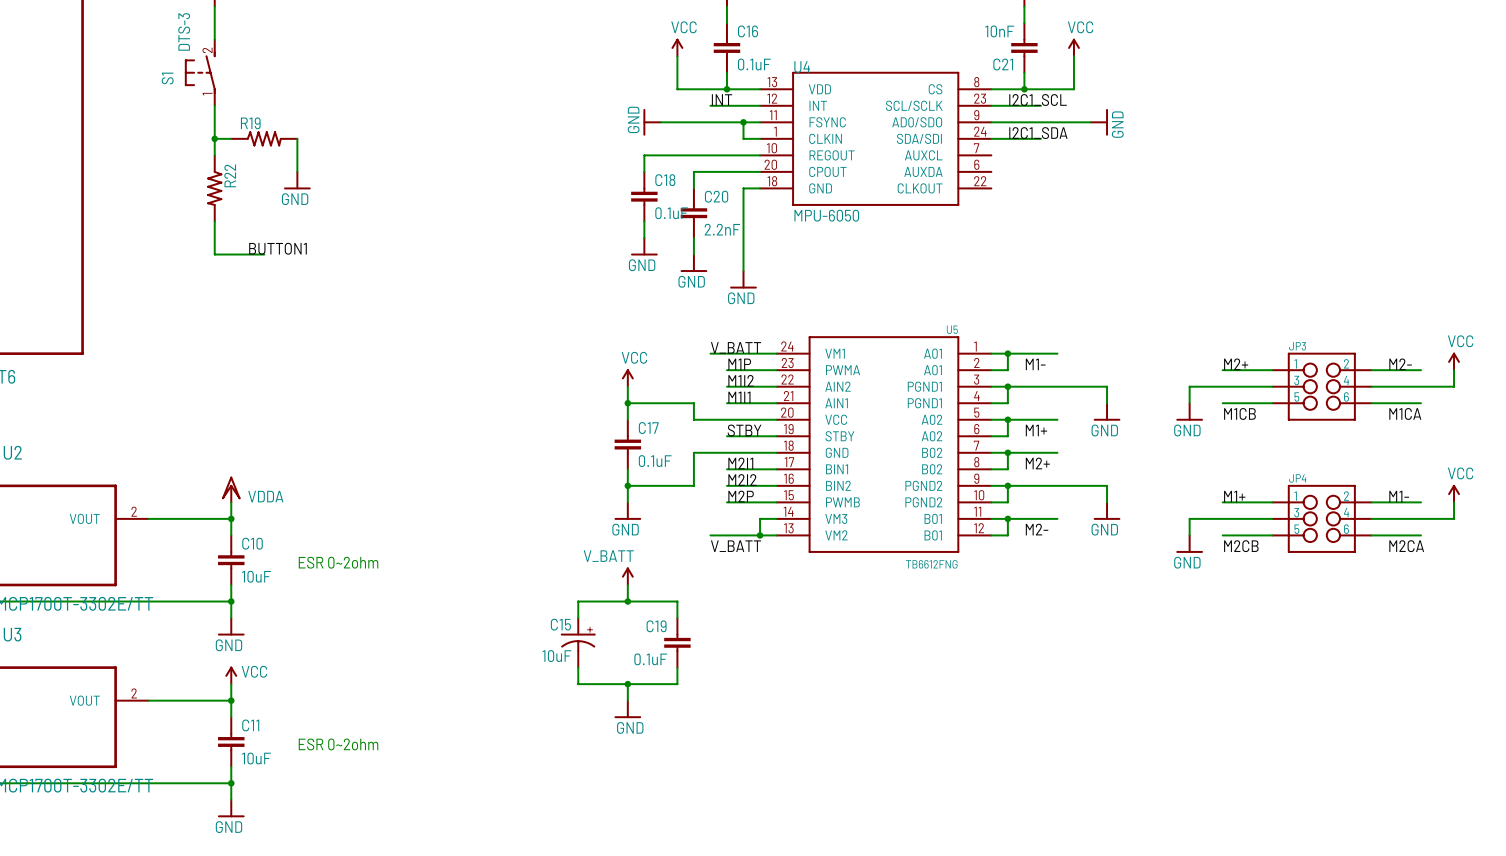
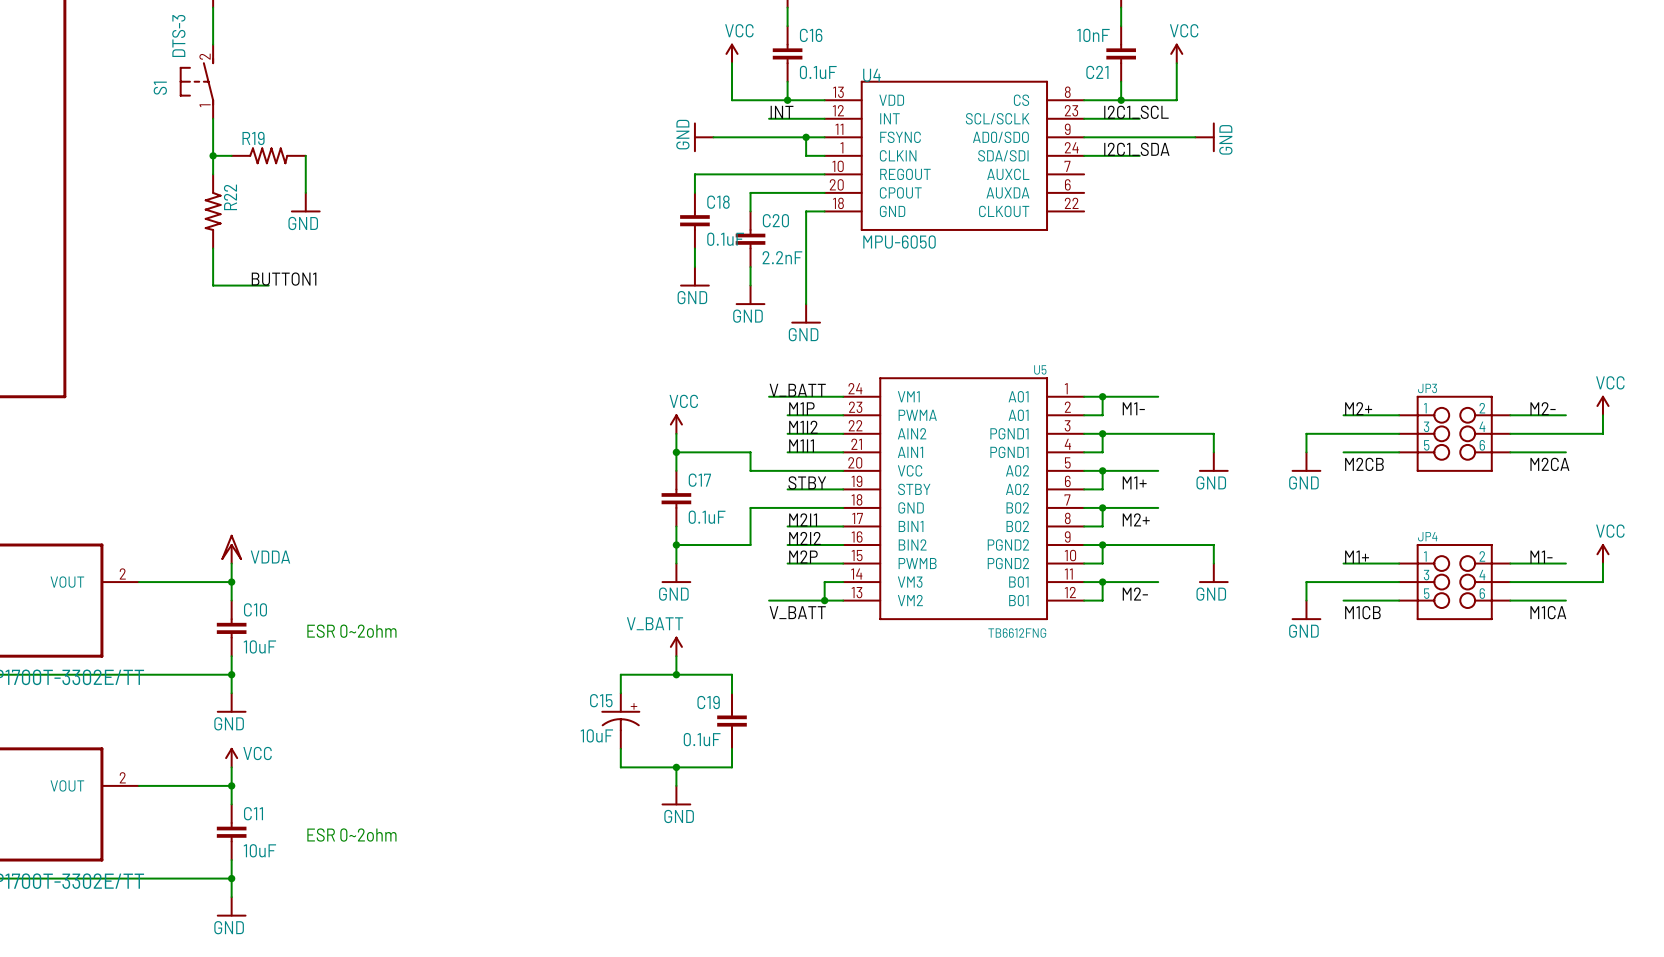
label: M1CB (1239, 413) -> M2CB (1364, 464)
label: M1CA (1405, 413) -> M2CA (1549, 464)
label: M2CB (1241, 546) -> M1CB (1362, 612)
label: M2CA (1406, 546) -> M1CA (1548, 612)

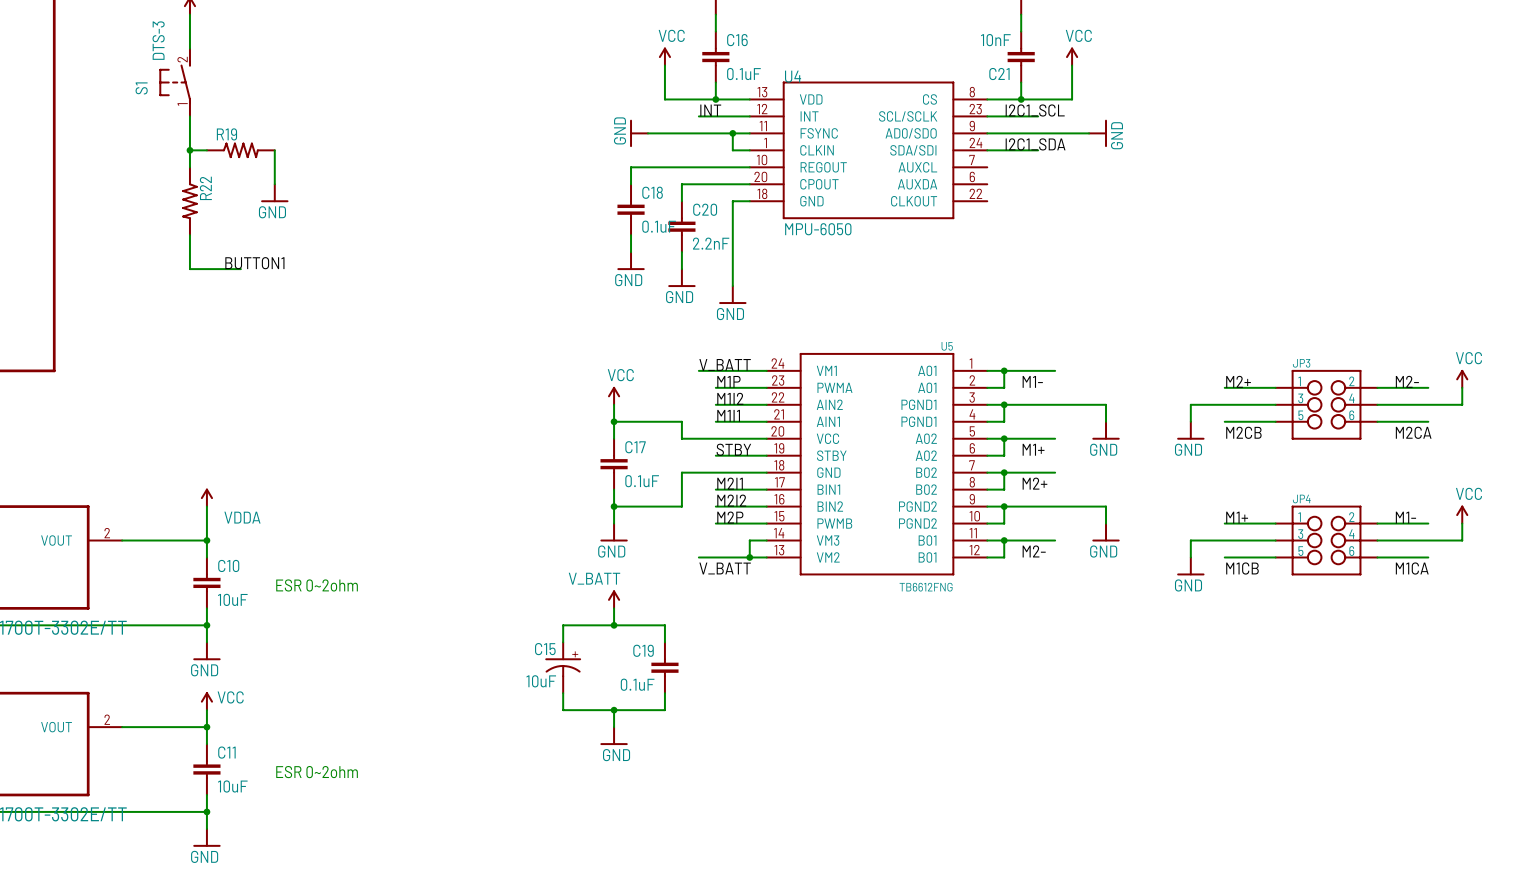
power symbol: none -> VDDA (206, 497)
power symbol: VDDA (231, 549) -> none

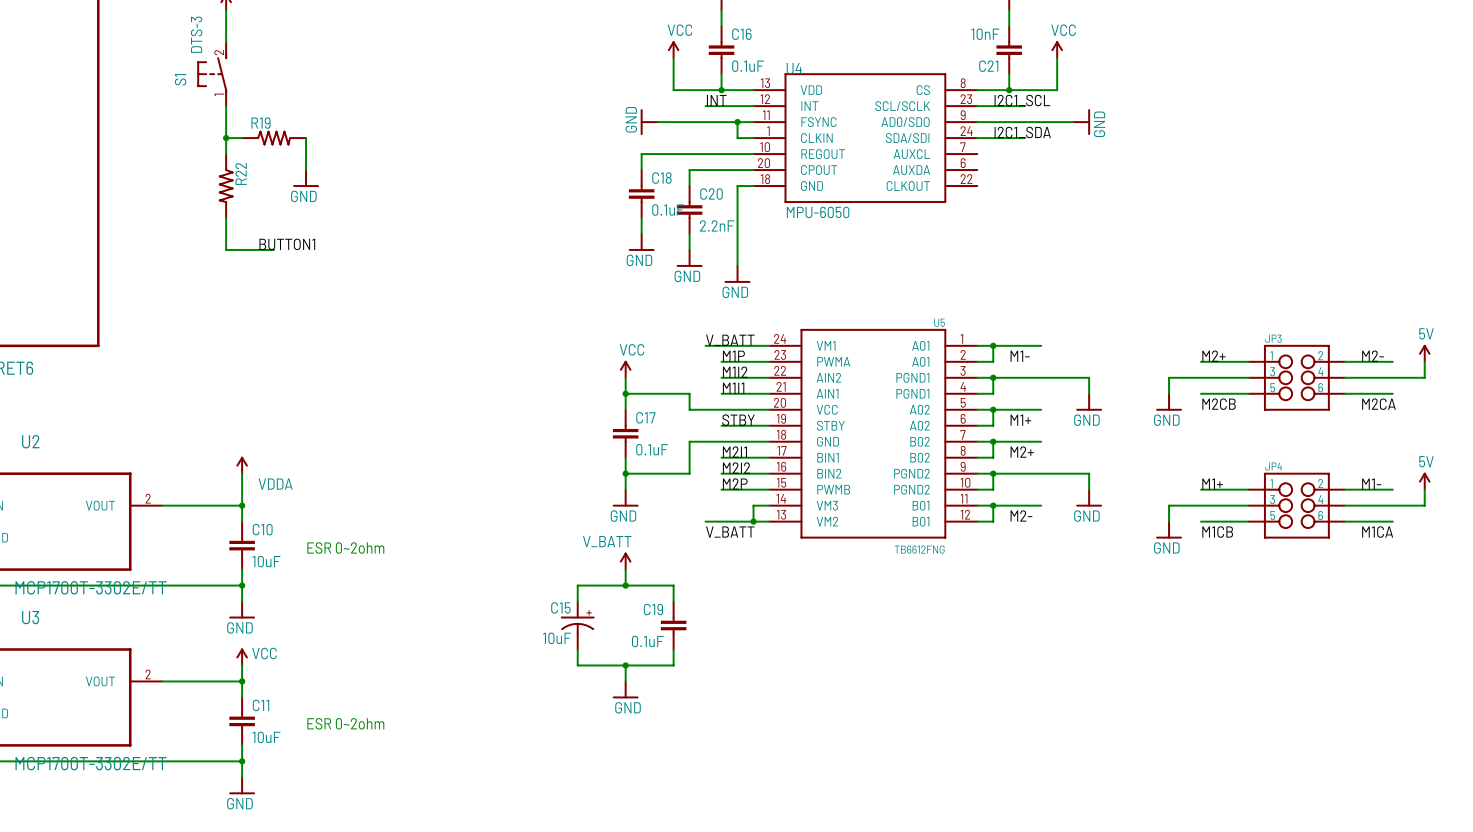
power symbol: VCC (1462, 378) -> 5V (1424, 353)
power symbol: VCC (1462, 514) -> 5V (1424, 481)

